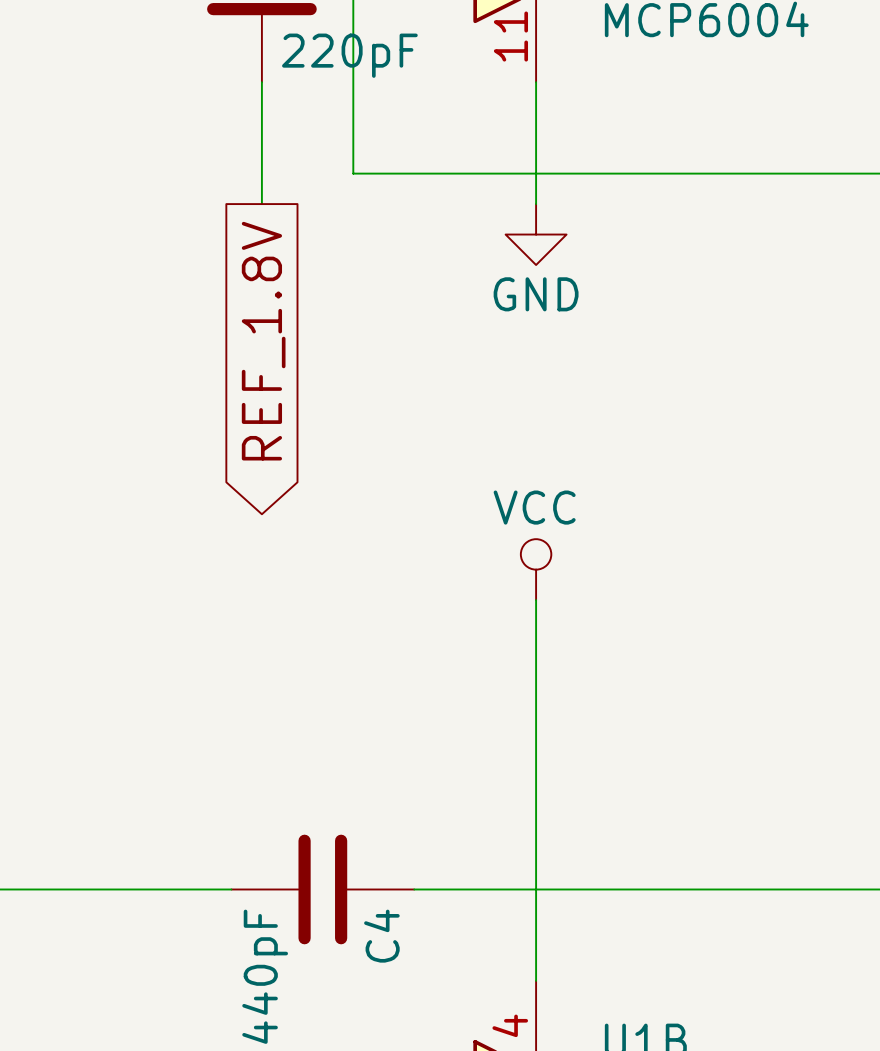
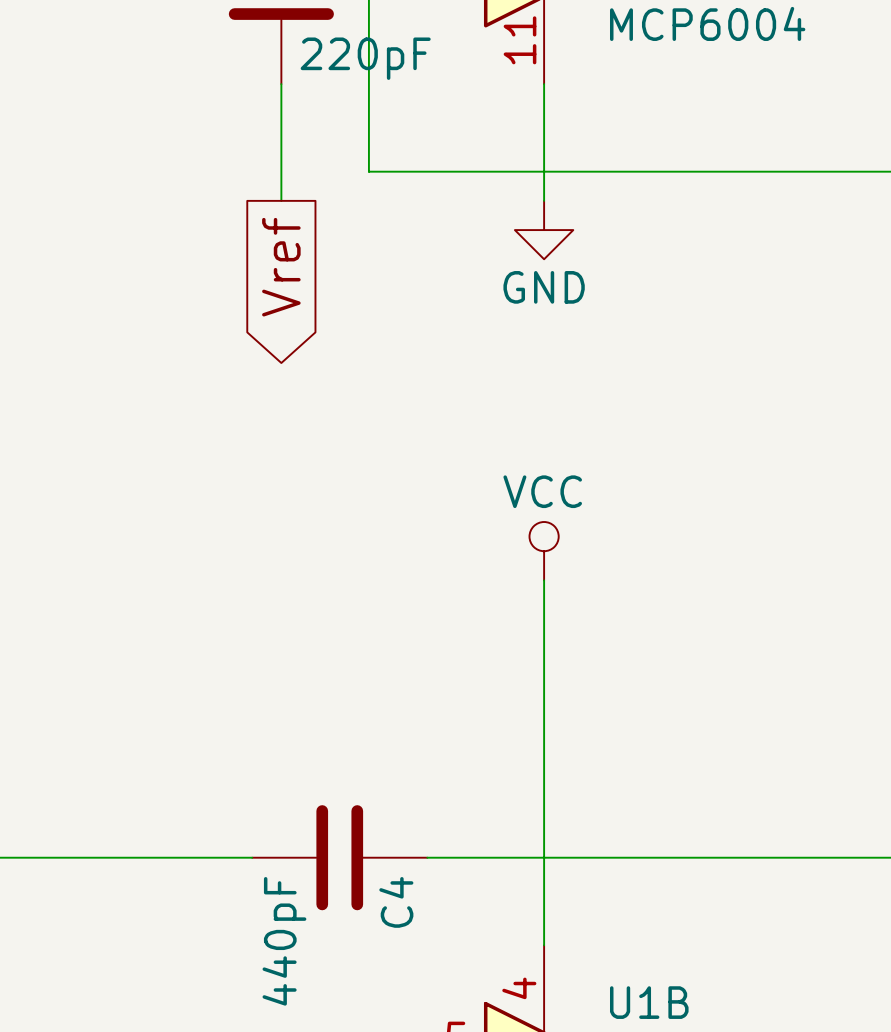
global label: REF_1.8V (263, 341) -> Vref (281, 267)

